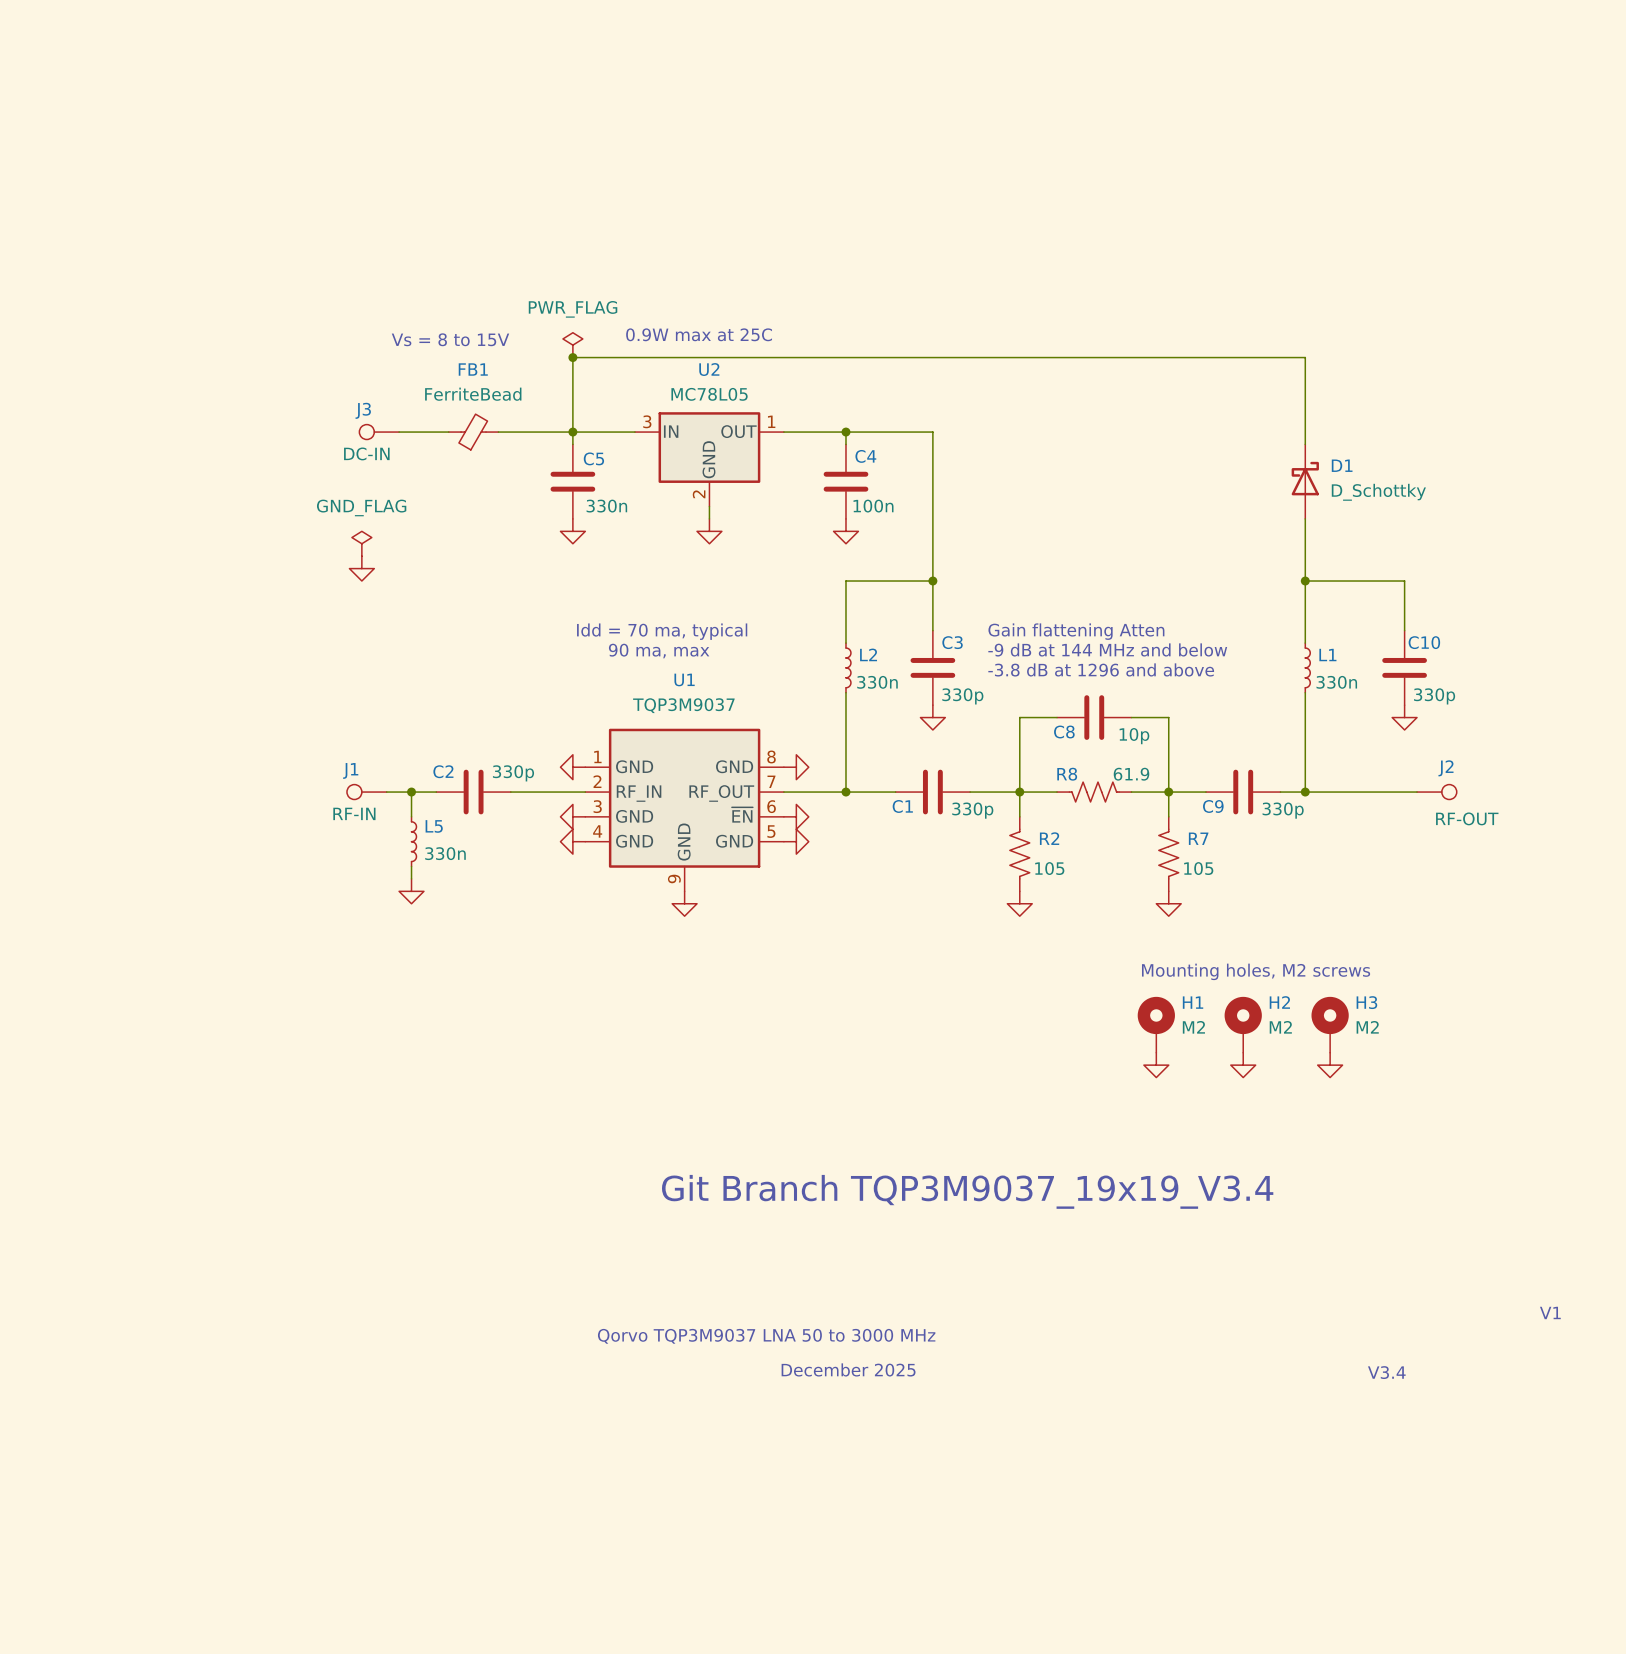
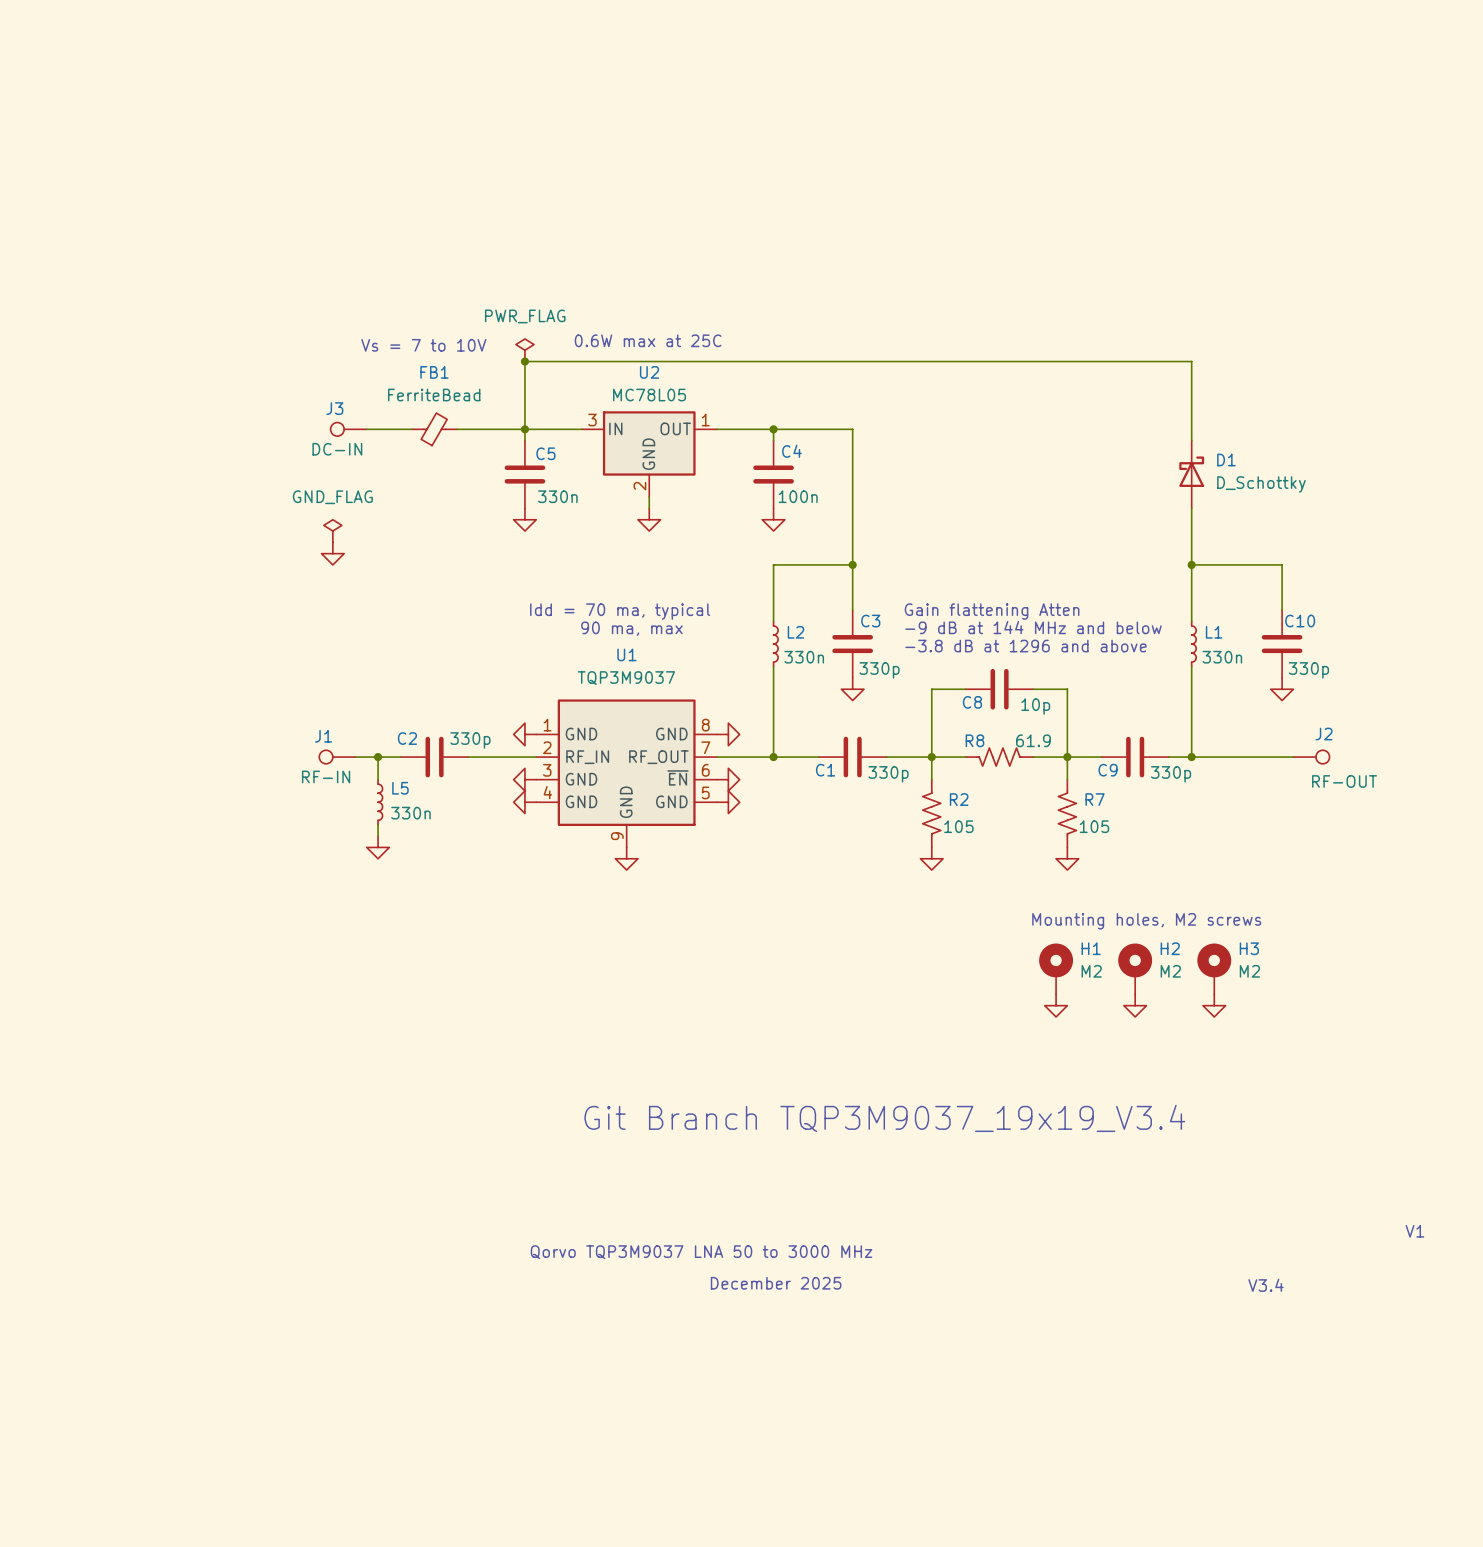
text: 0.9W max at 25C (699, 334) -> 0.6W max at 25C (648, 340)
text: Vs = 8 to 15V (450, 339) -> Vs = 7 to 10V (423, 345)

